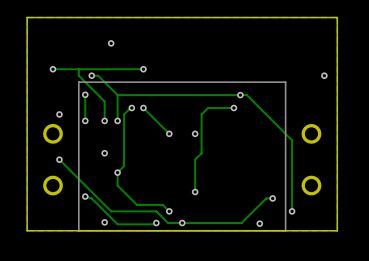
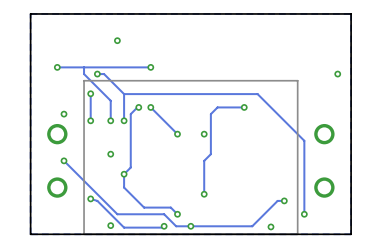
via: (240, 95) -> none

